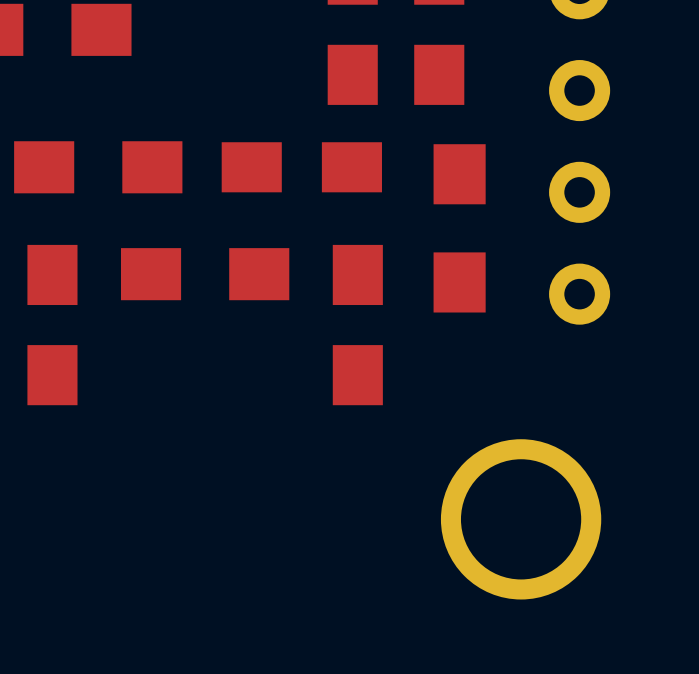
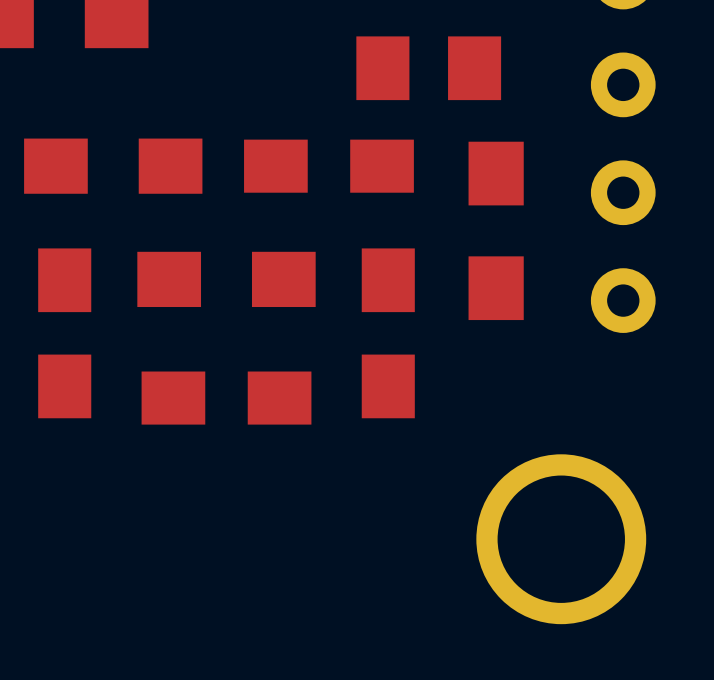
part: none -> (226, 398)

